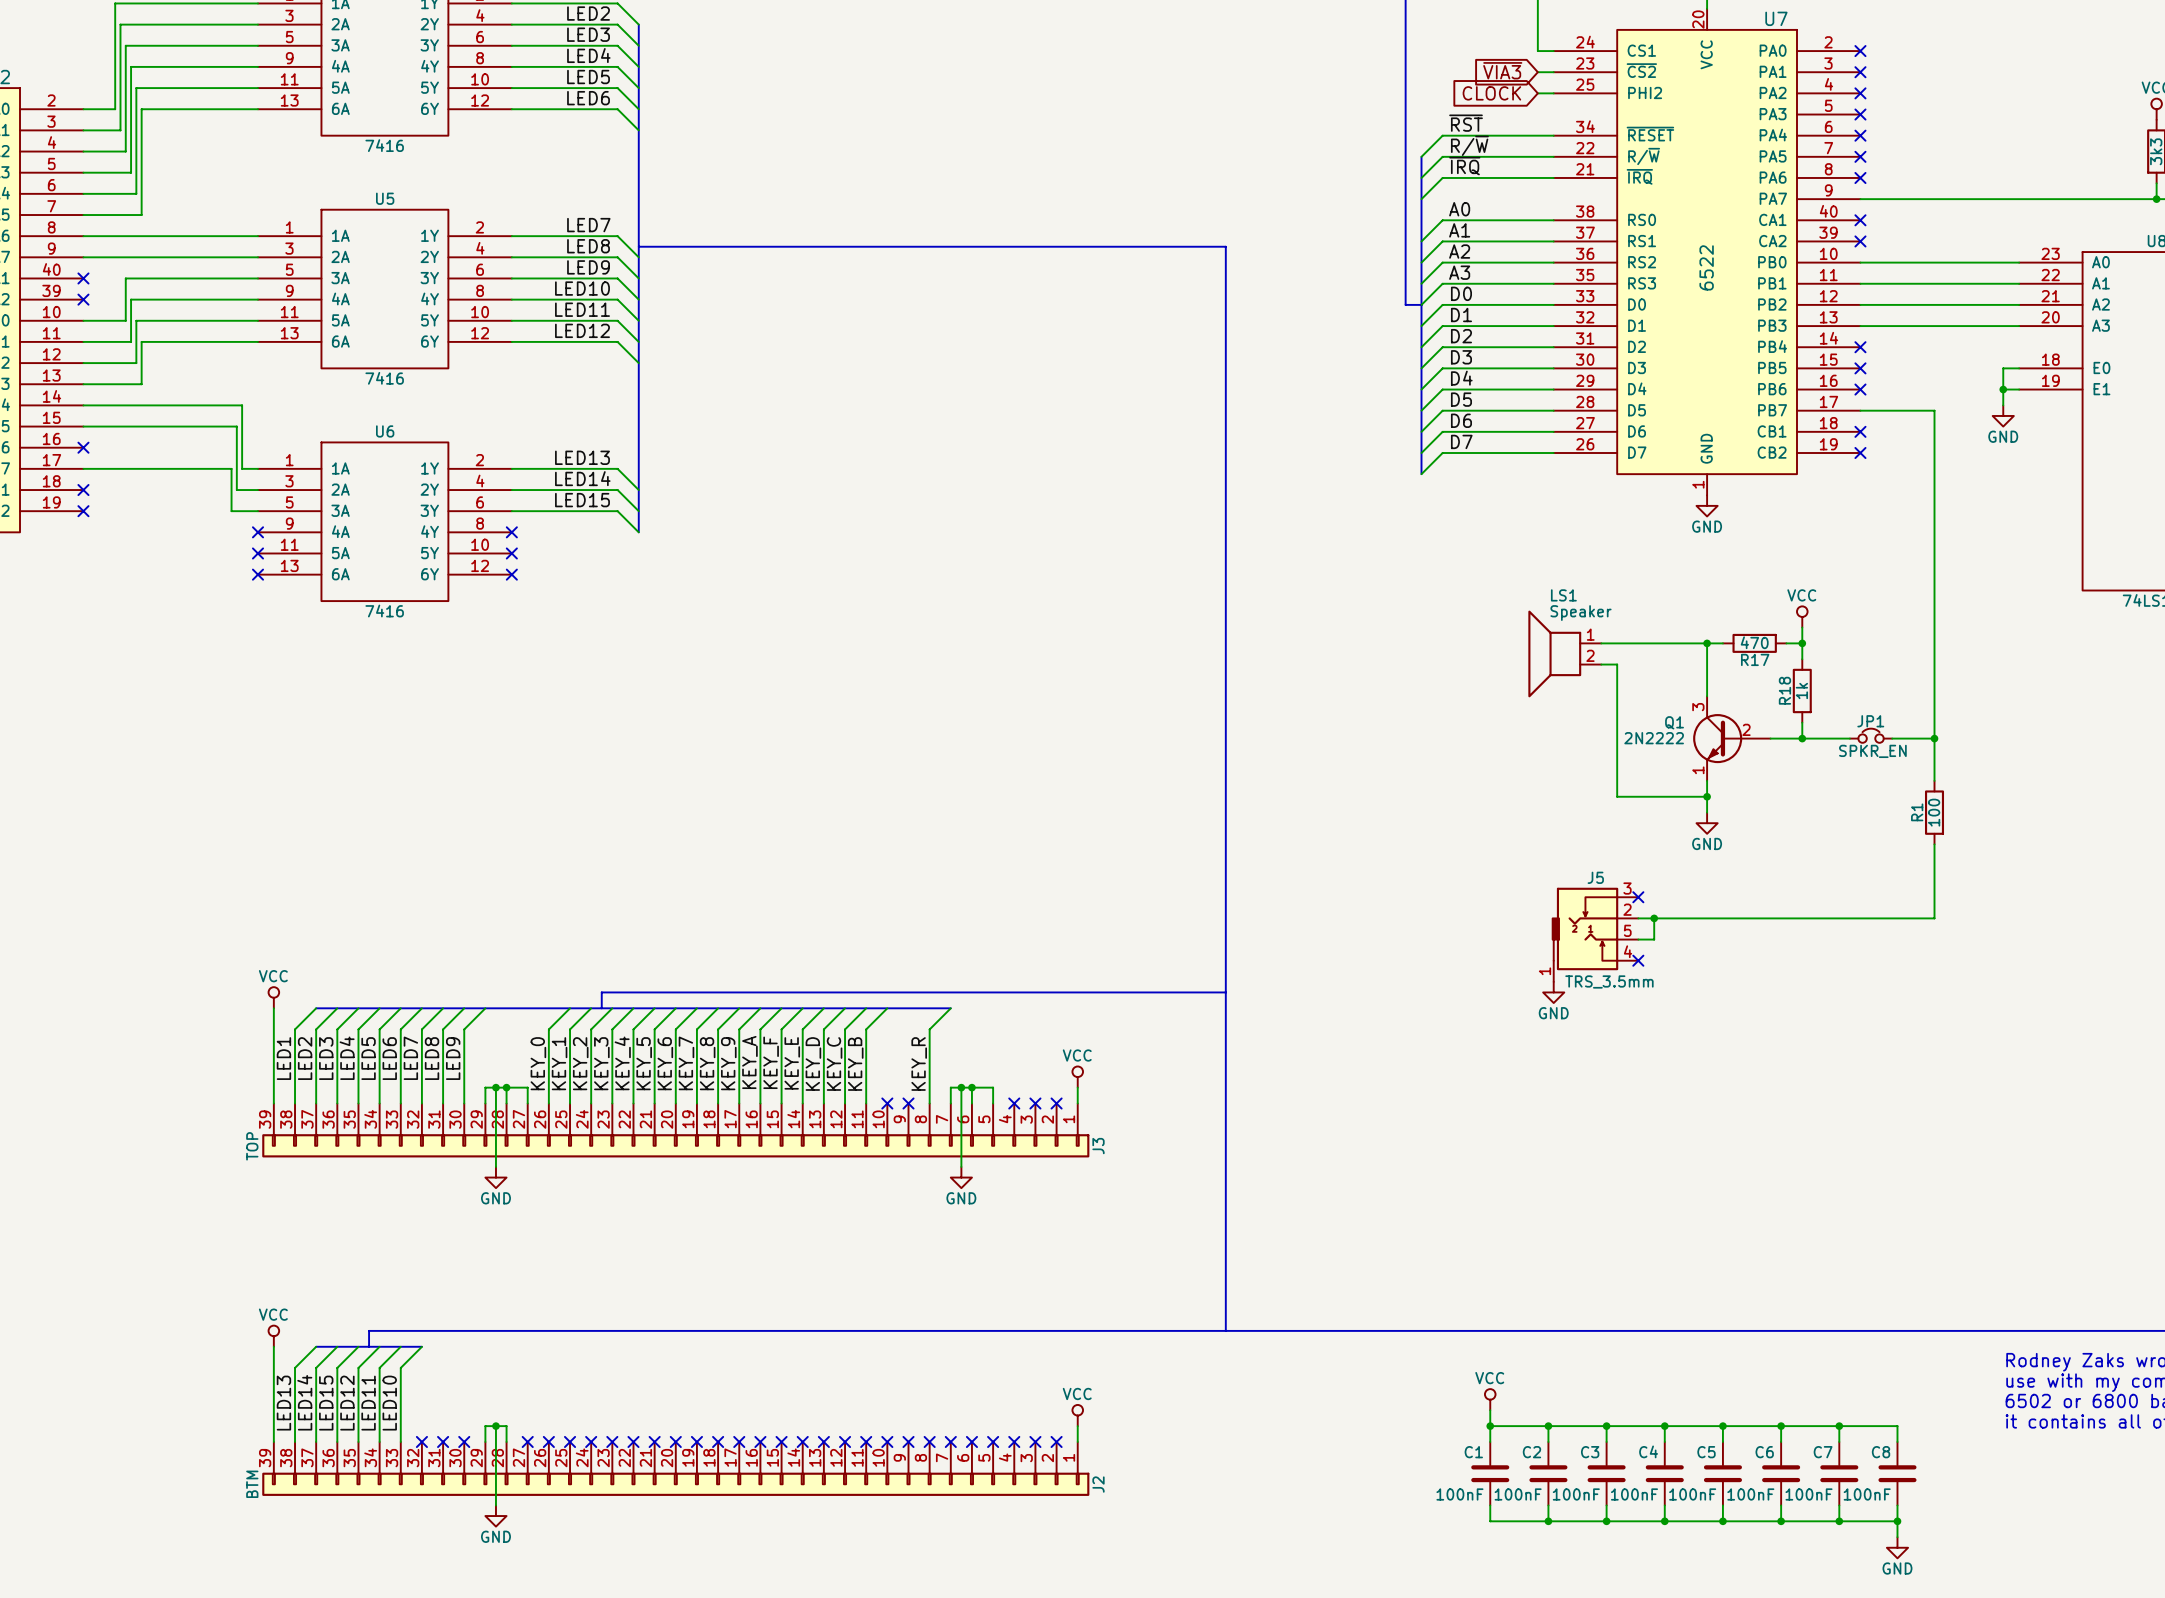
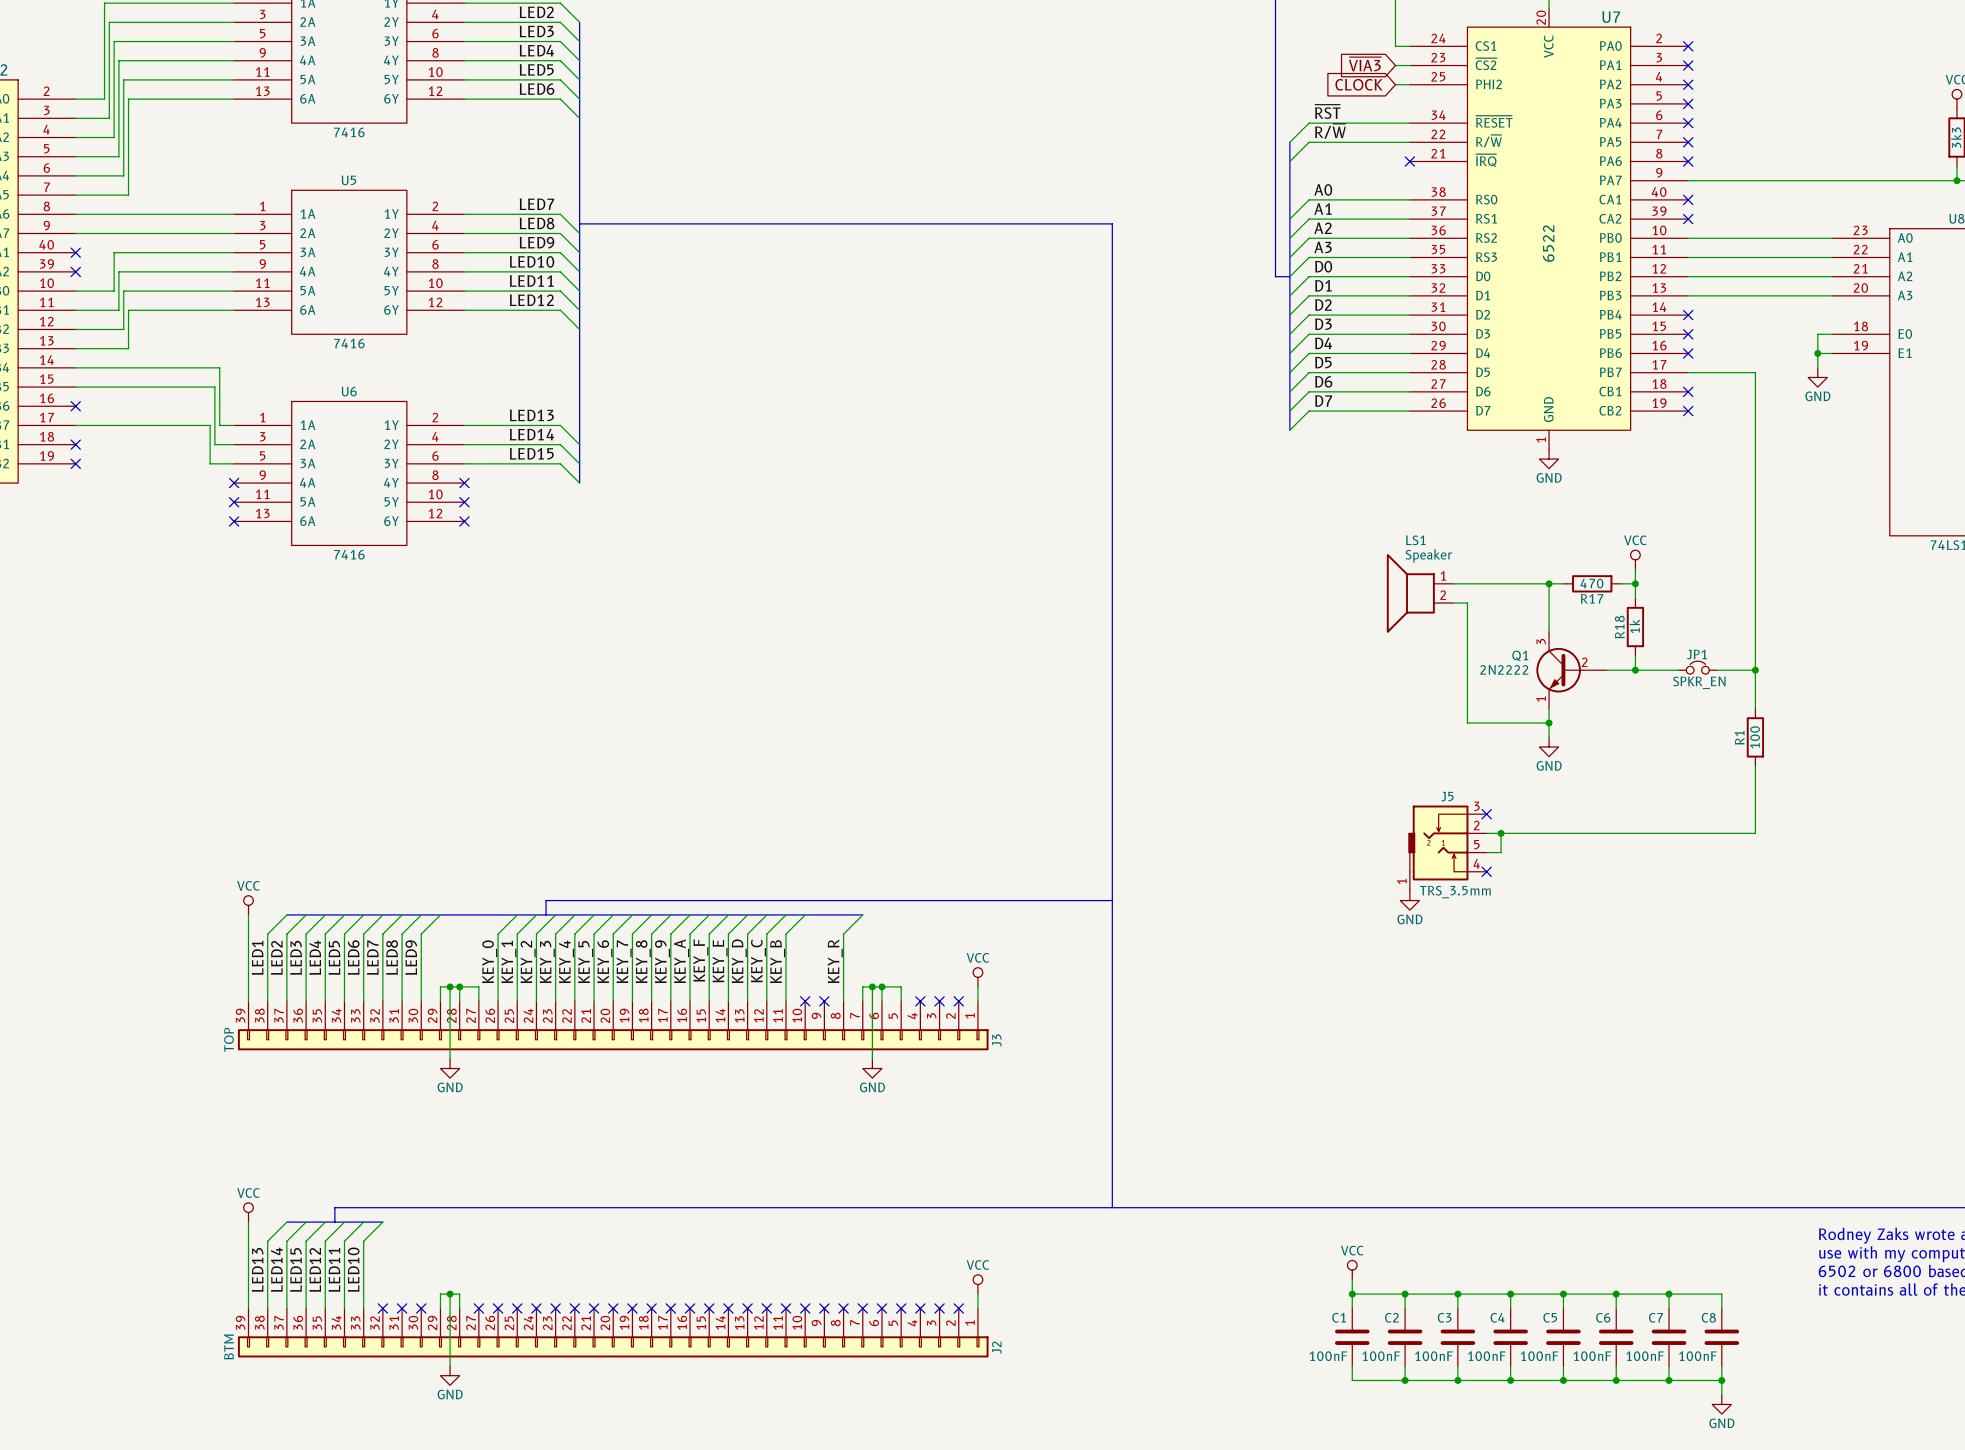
label: ~{IRQ} (1464, 166) -> none
wire: (1553, 177) (1442, 177) (1421, 199) -> none
no-connect mark: none -> (1409, 161)

